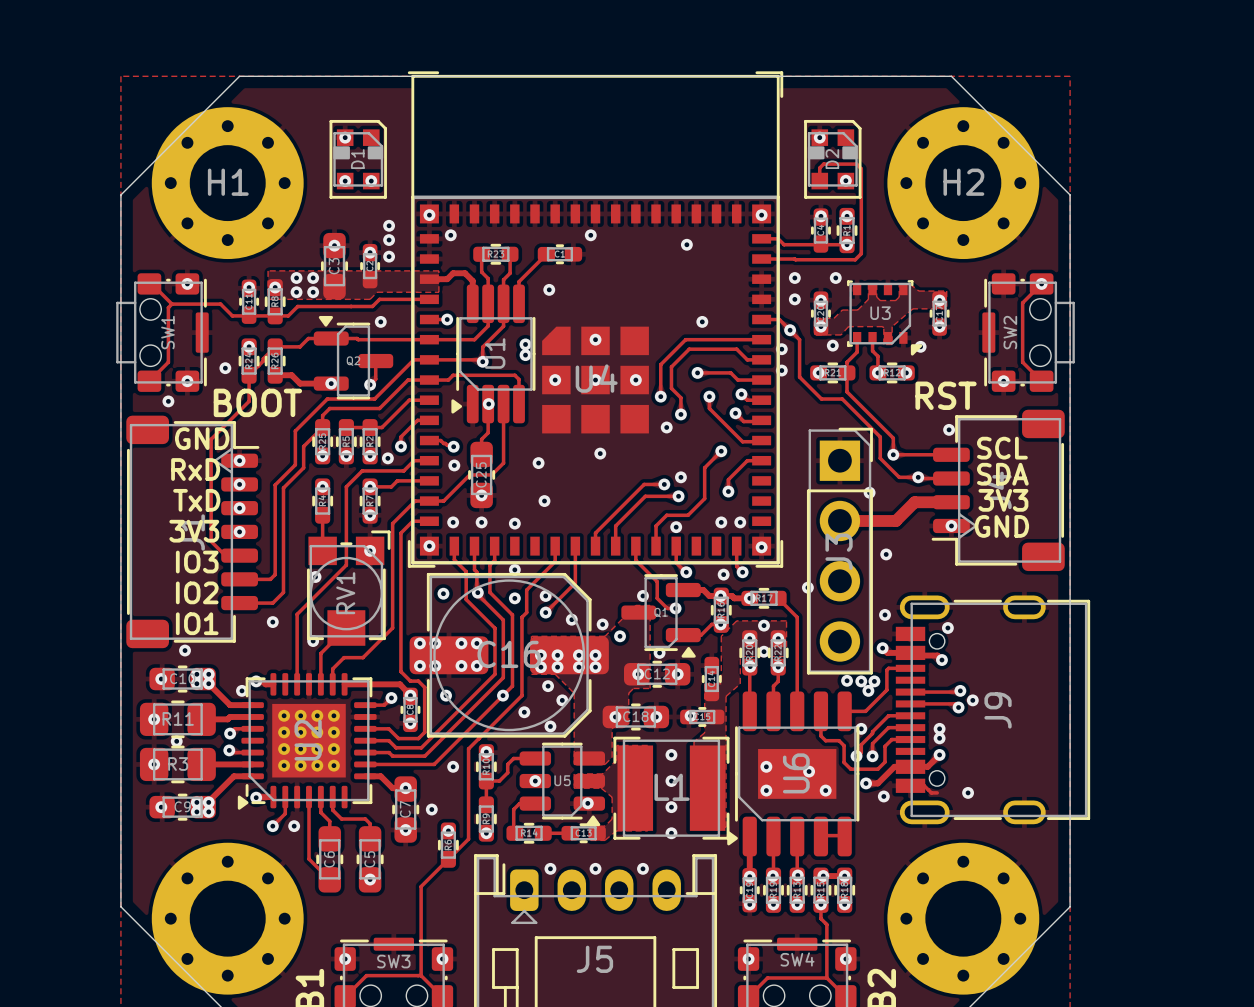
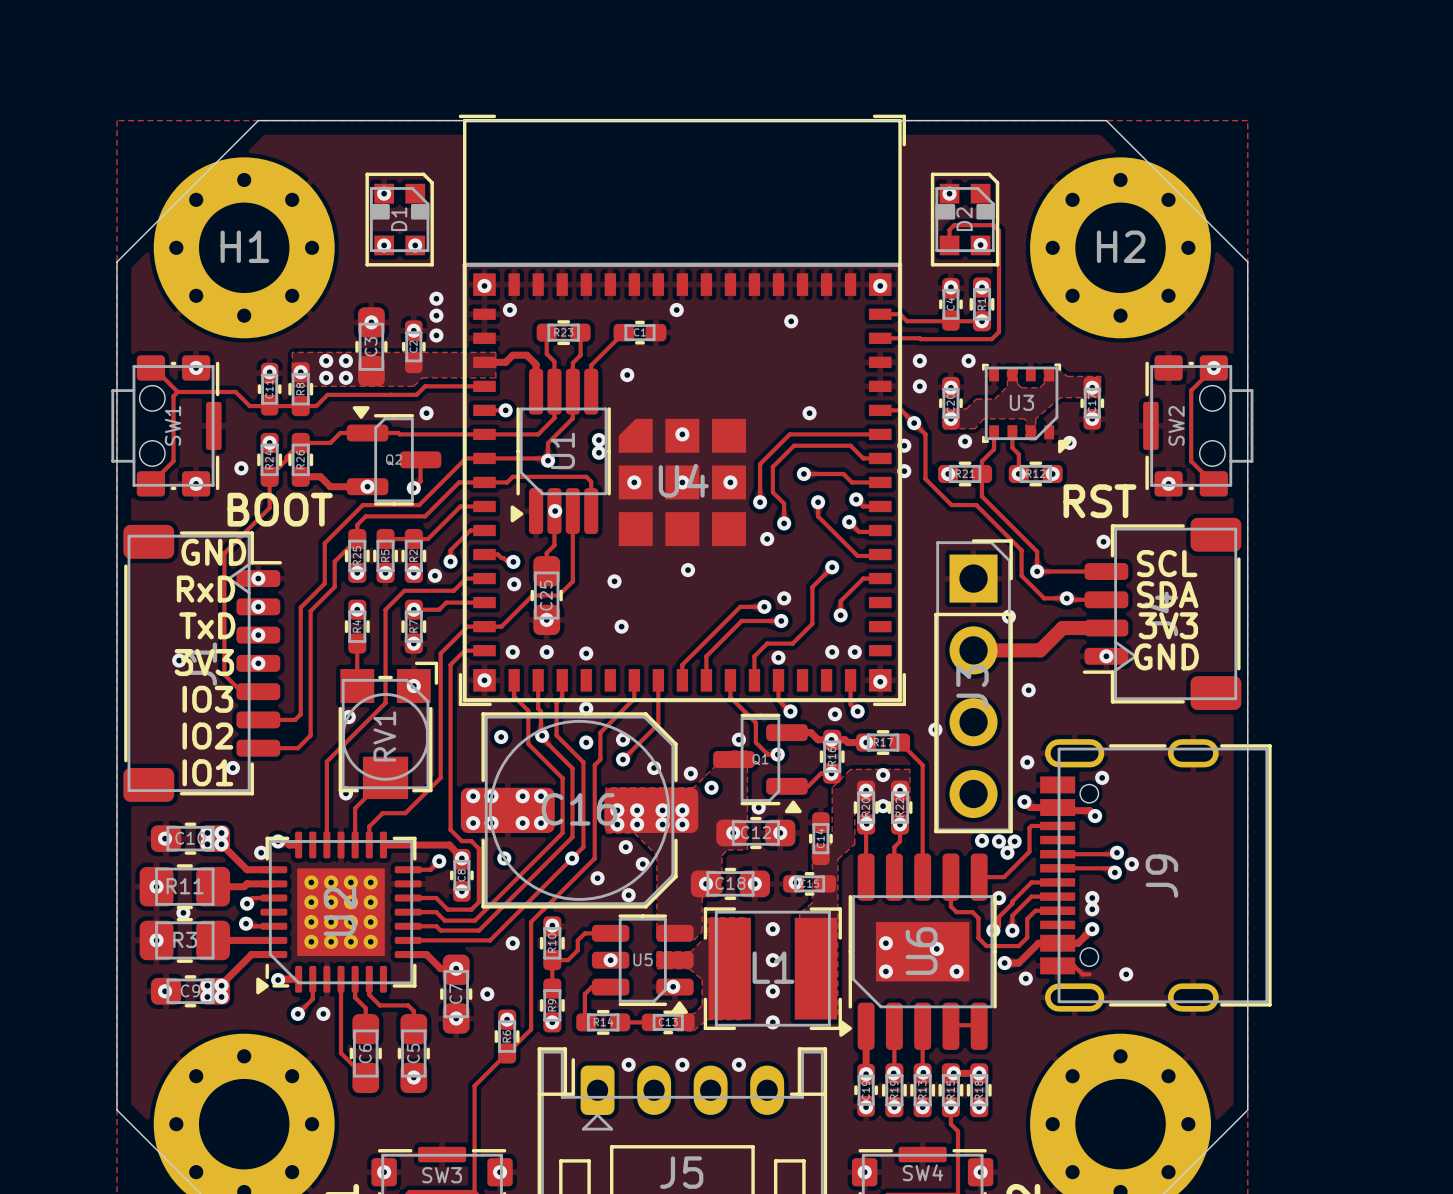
via: (168, 401) -> none
via: none -> (179, 660)
via: none -> (232, 767)
via: (272, 622) -> none
via: (185, 650) -> none

